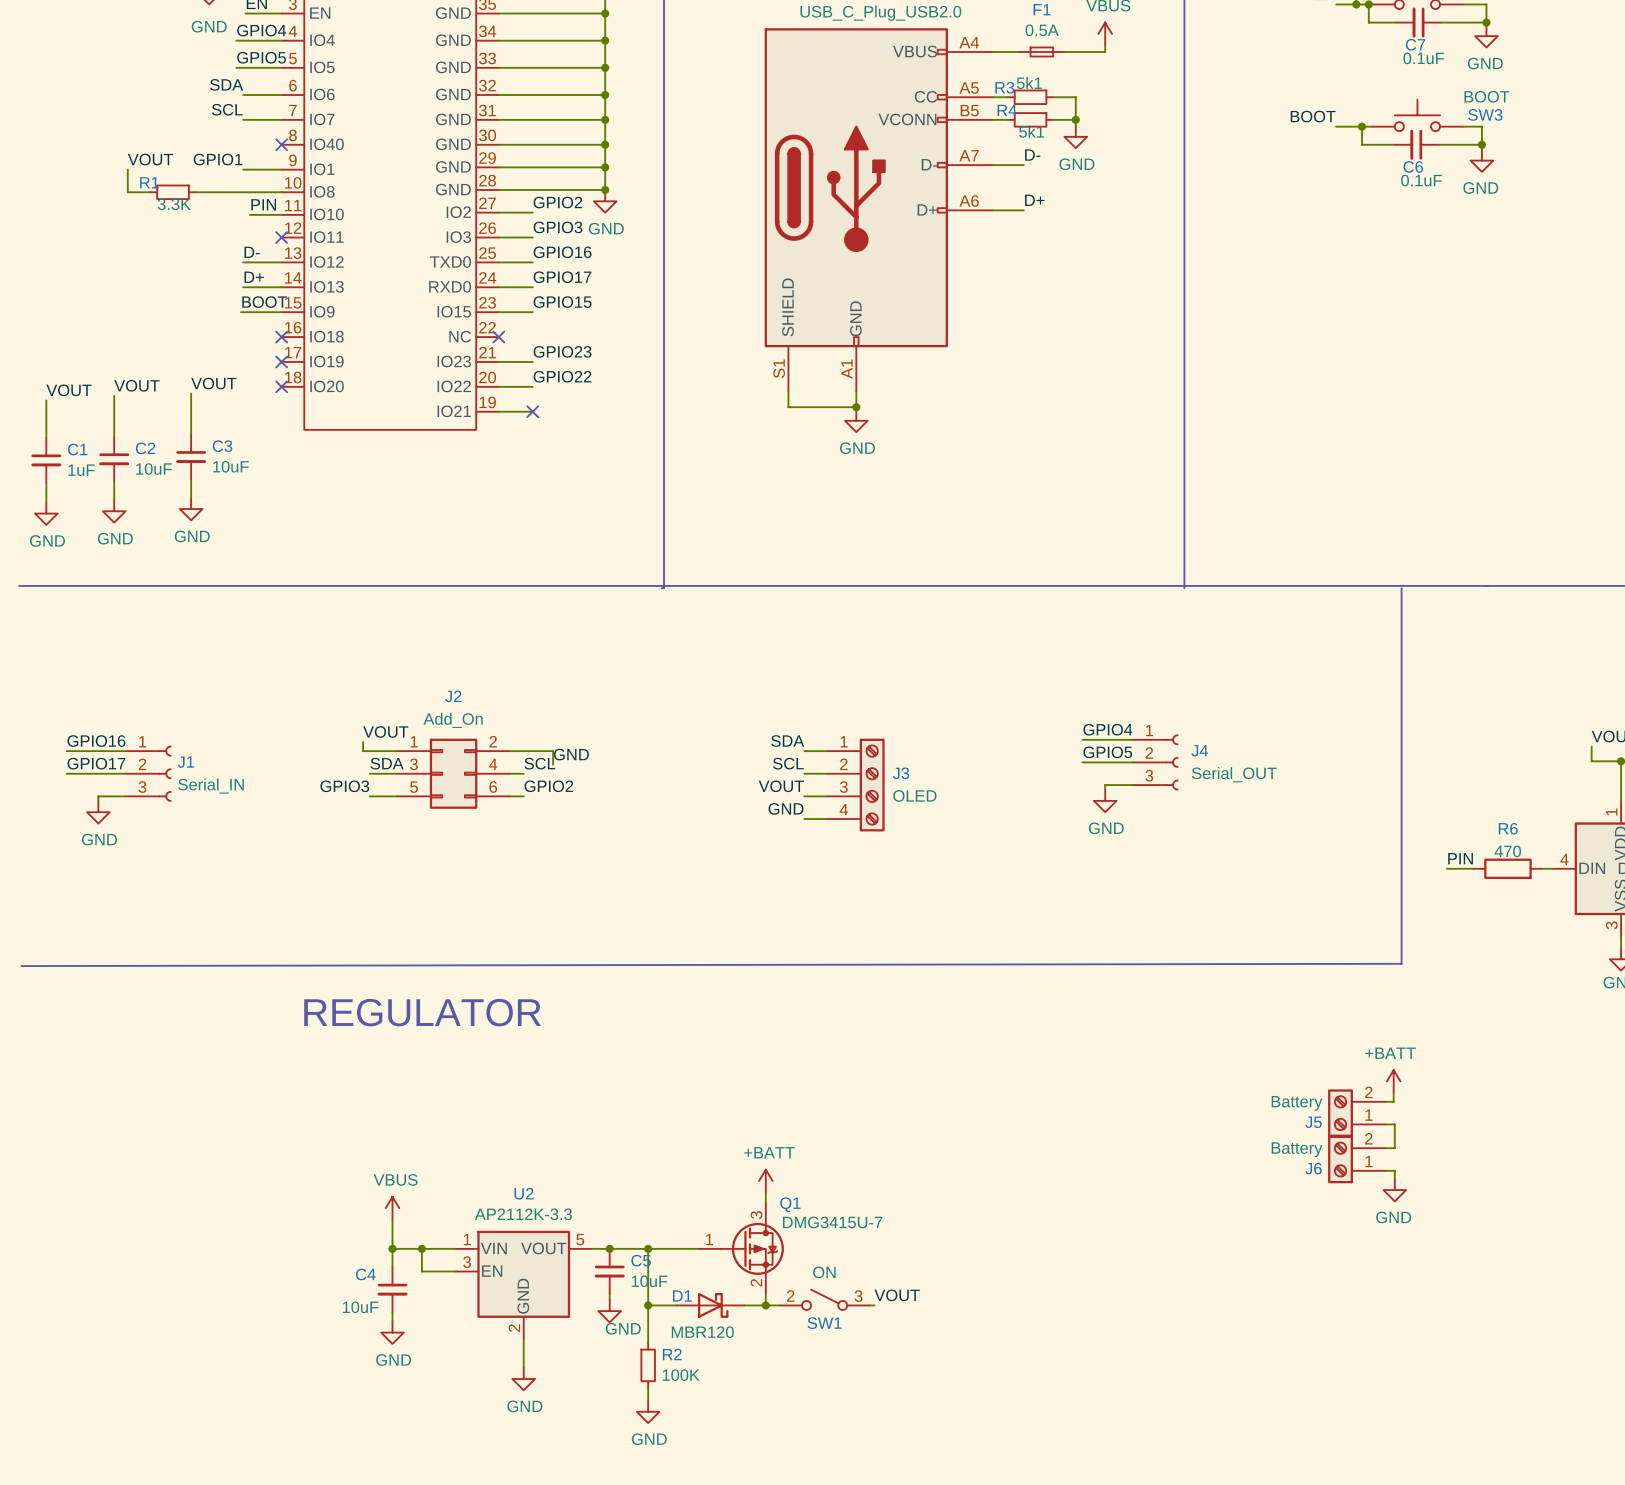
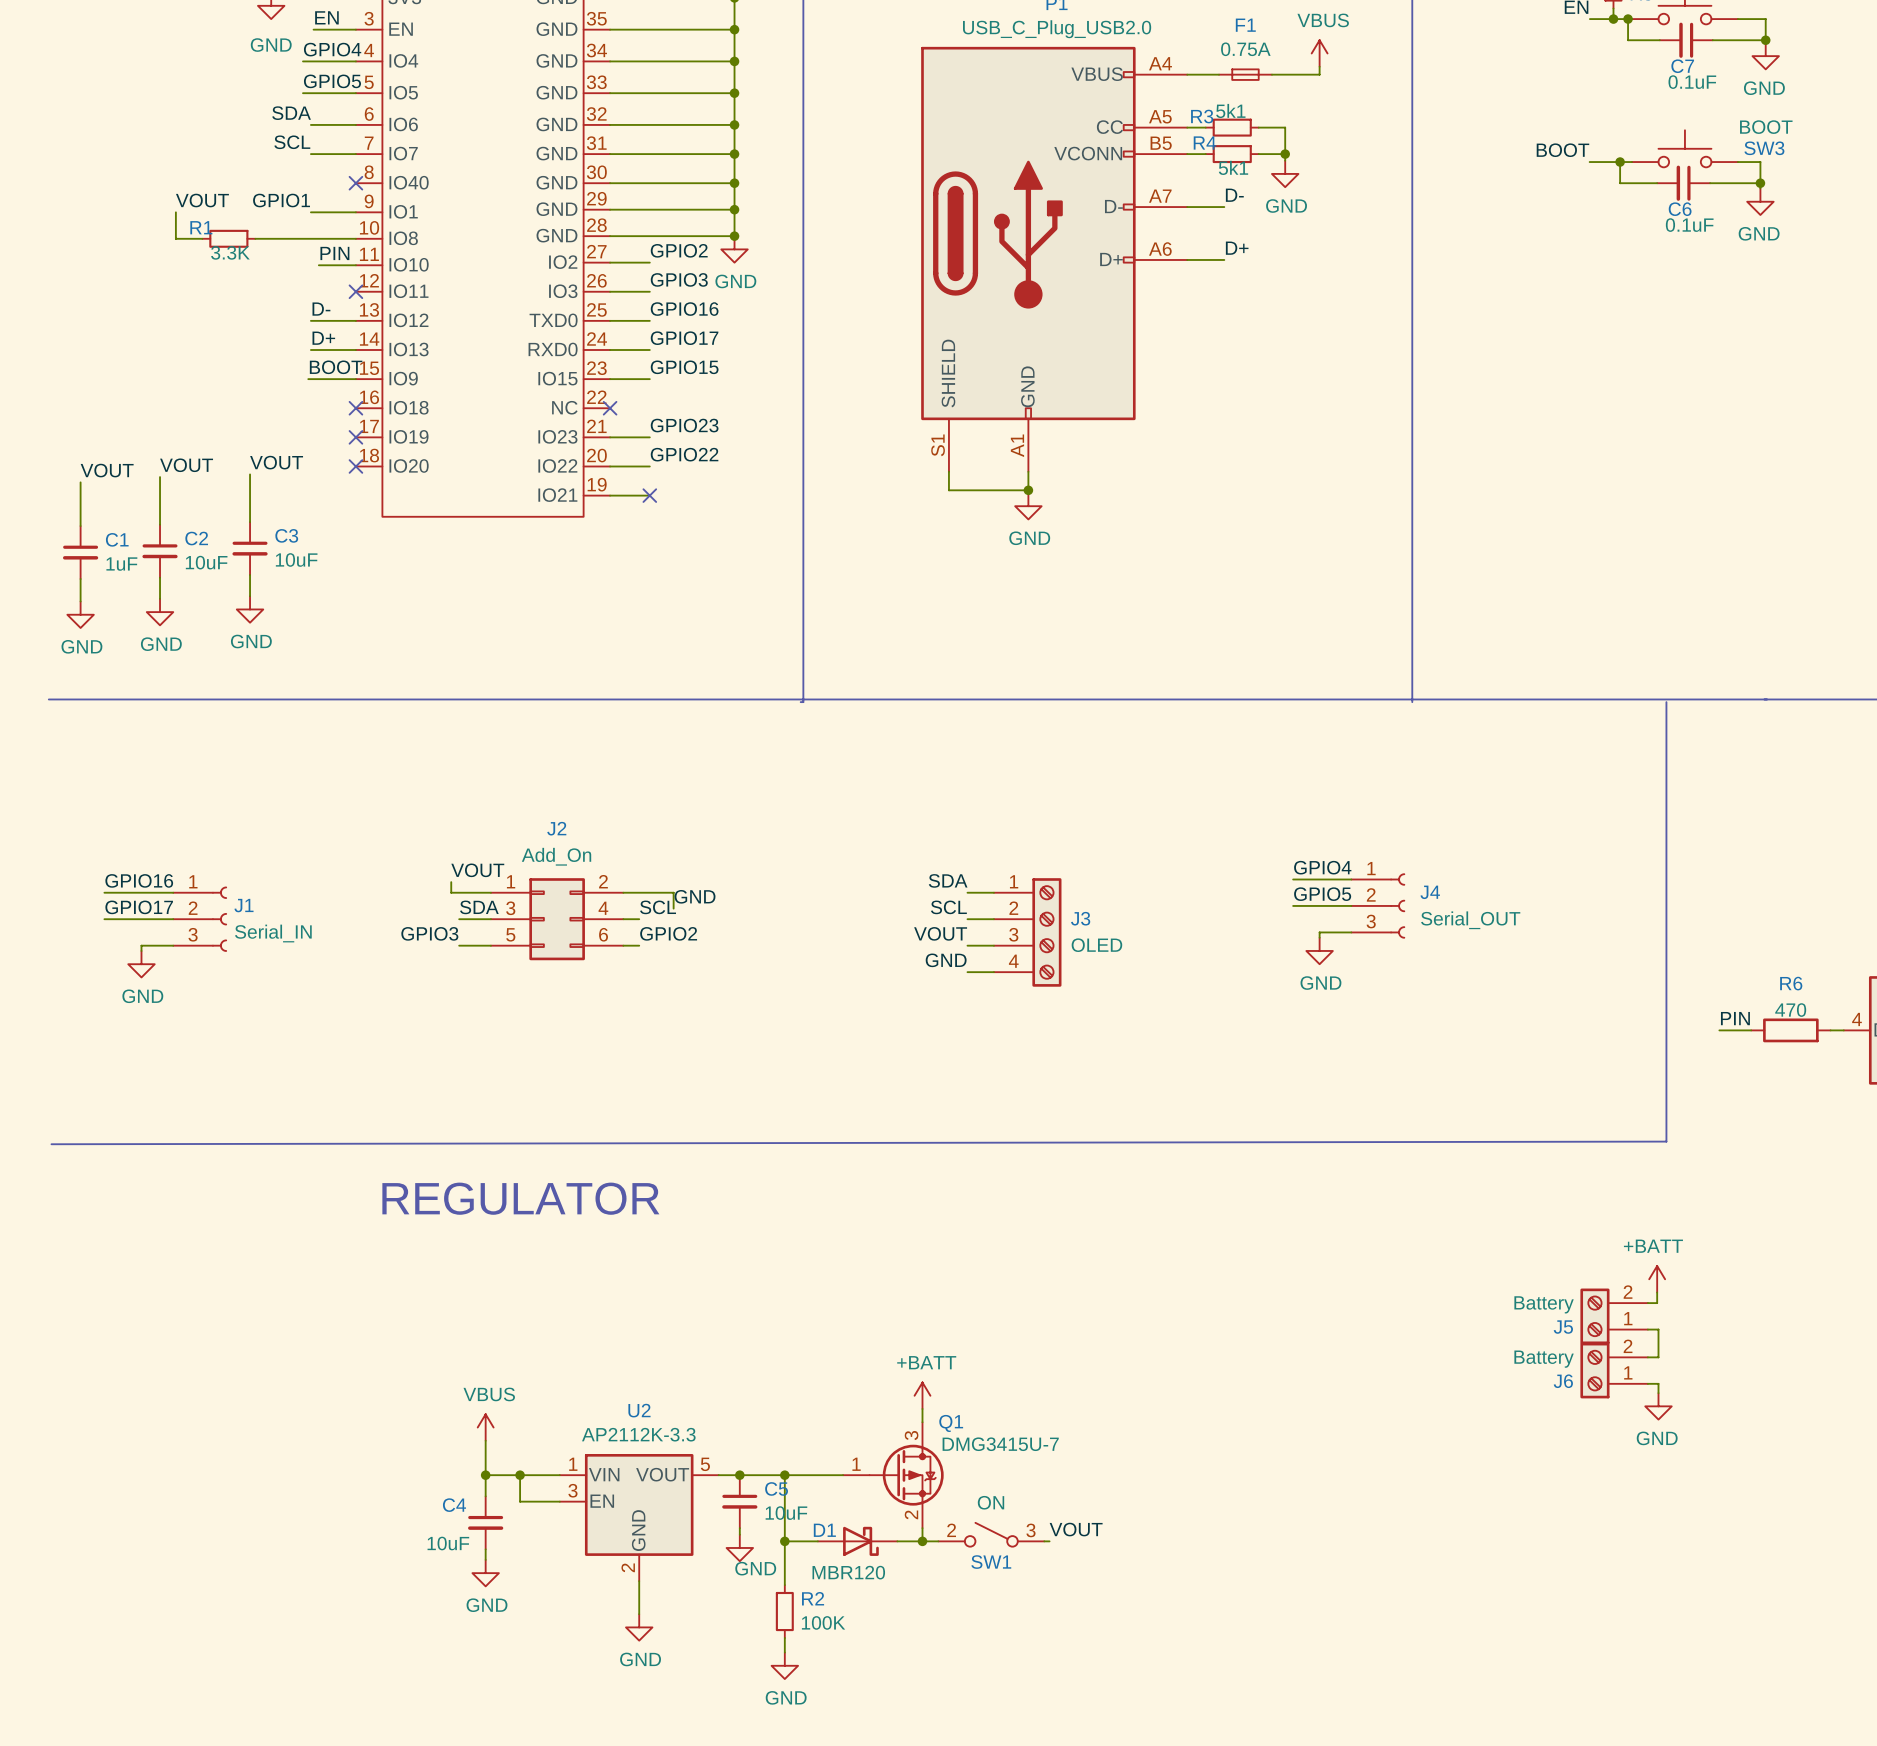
F1 value: 0.5A (1042, 30) -> 0.75A (1245, 49)

